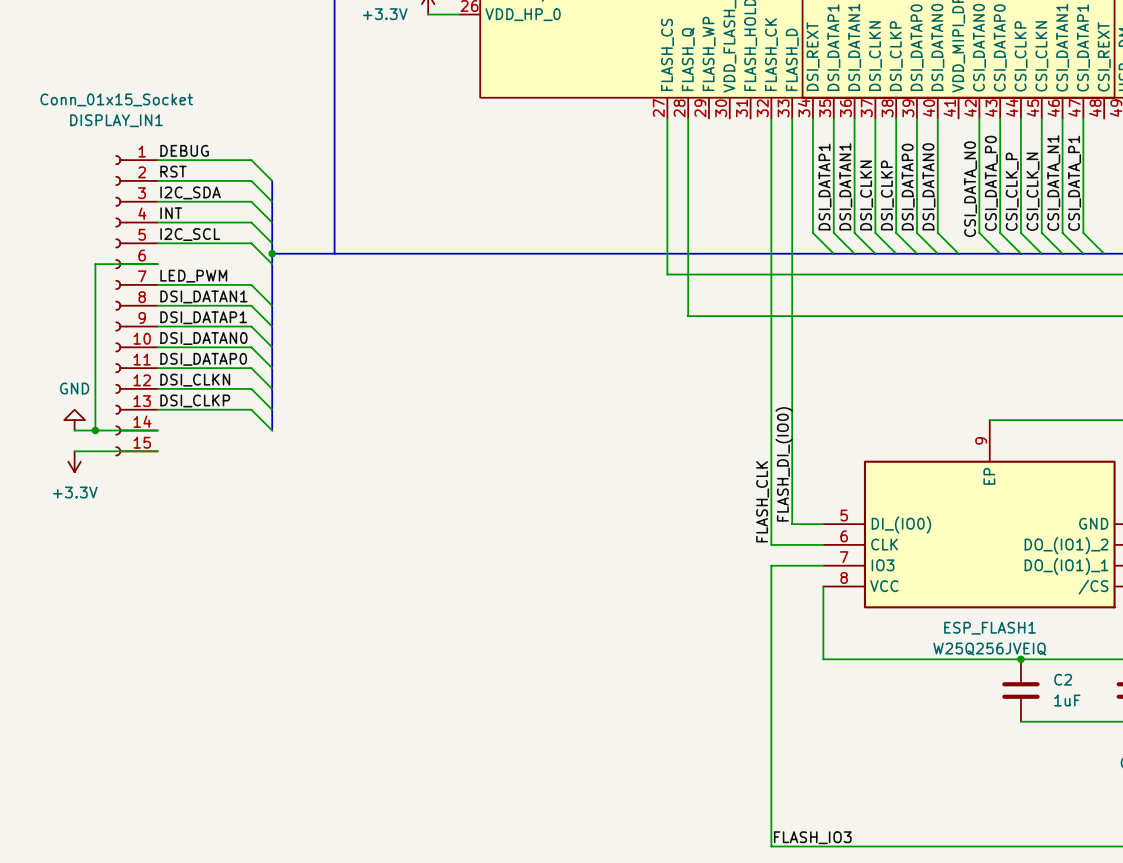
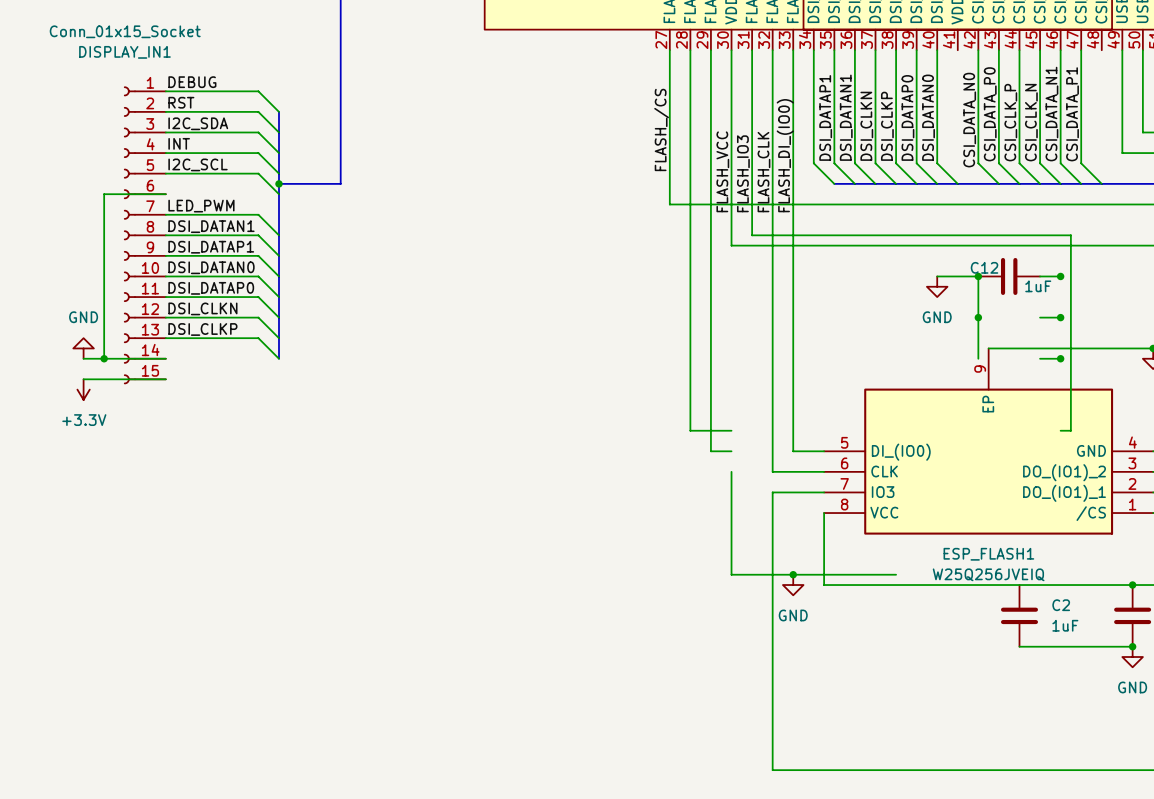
wire: none -> (710, 50) (710, 451) (731, 451)
wire: none -> (731, 50) (731, 245)
wire: none -> (752, 50) (752, 235) (1070, 235) (1070, 430) (1060, 430)
label: none -> FLASH_/CS (661, 129)
label: none -> FLASH_DI_(IO0) (785, 155)
label: none -> FLASH_VCC (722, 171)
label: none -> FLASH_CLK (763, 172)
label: none -> FLASH_IO3 (743, 173)
bus: (334, 253) (833, 253) -> none
wire: (688, 316) (729, 316) -> (690, 245) (690, 430) (731, 430)
wire: none -> (937, 276) (978, 276) (978, 358)
junction: none -> (978, 276)
C12: none -> 1uF (1009, 276)
wire: none -> (1040, 276) (1060, 276)
junction: none -> (1060, 276)
power symbol: none -> GND (937, 286)
junction: none -> (978, 317)
wire: none -> (1040, 317) (1060, 317)
junction: none -> (1060, 317)
wire: none -> (1040, 358) (1060, 358)
junction: none -> (1060, 358)
label: FLASH_DI_(IO0) (784, 464) -> none
label: FLASH_CLK (762, 501) -> none
wire: none -> (731, 471) (731, 574) (896, 574)
junction: none -> (793, 574)
power symbol: none -> GND (793, 585)
junction: (1020, 659) -> none
label: FLASH_IO3 (812, 837) -> none

